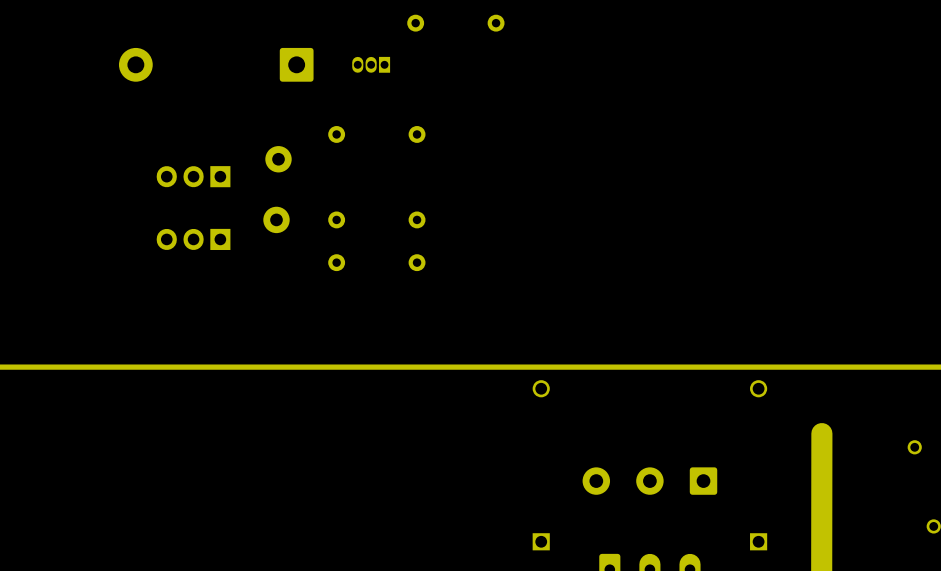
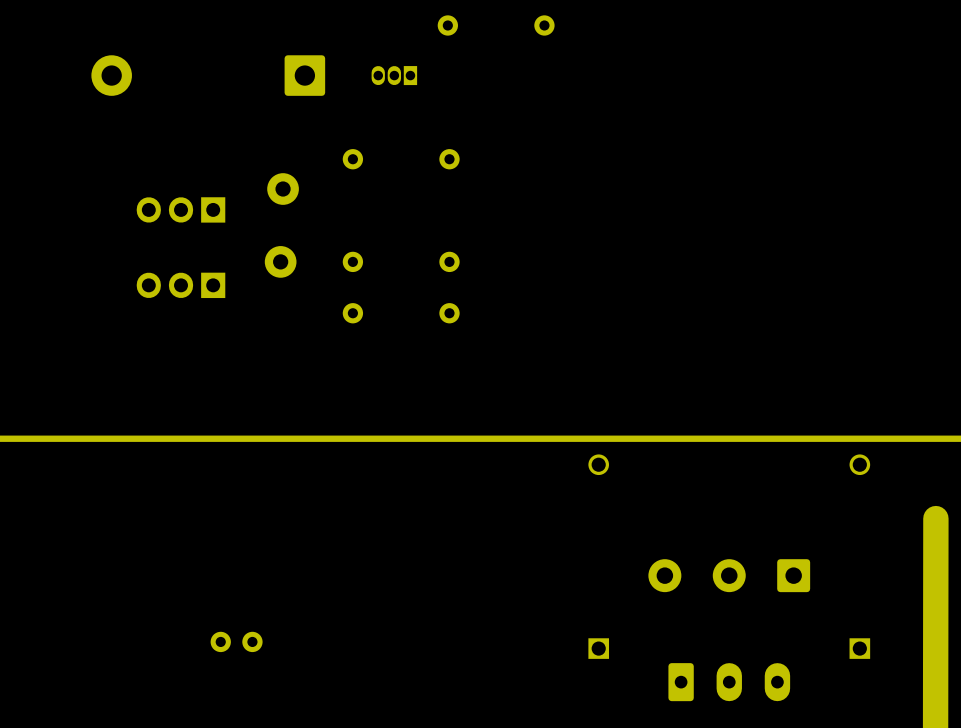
part: none -> (236, 641)

